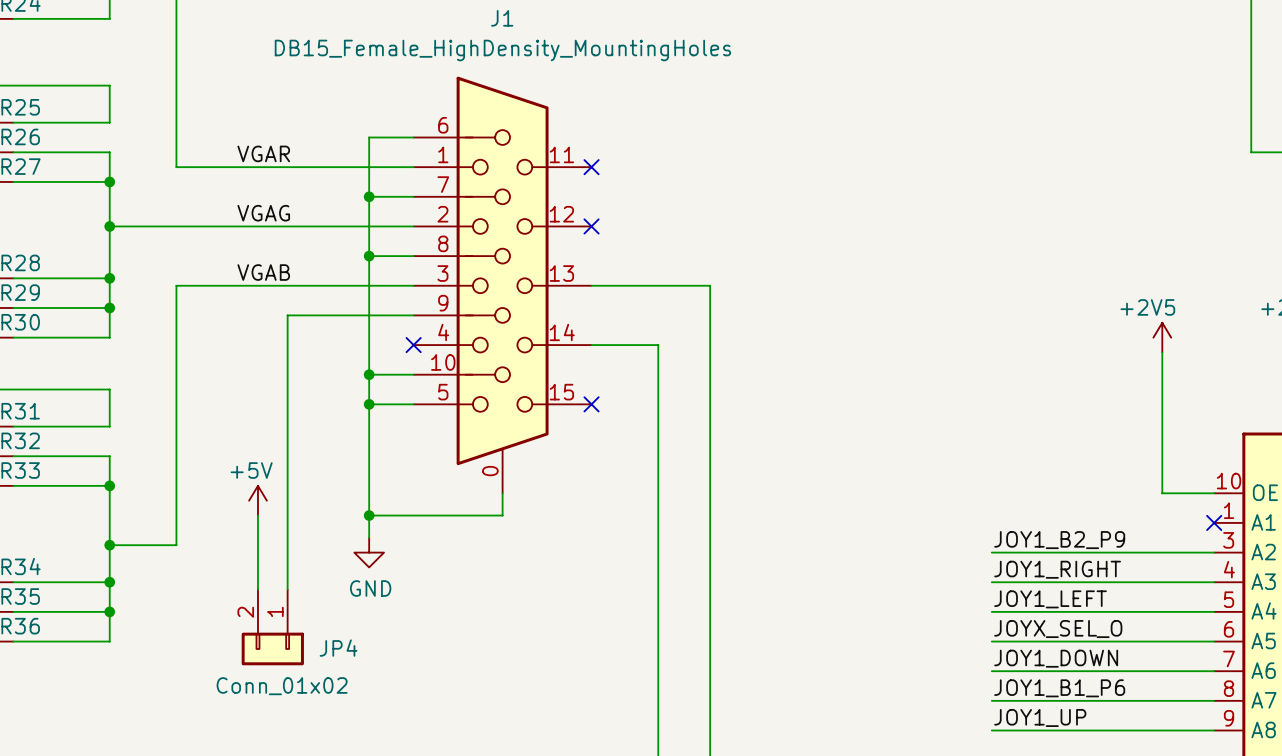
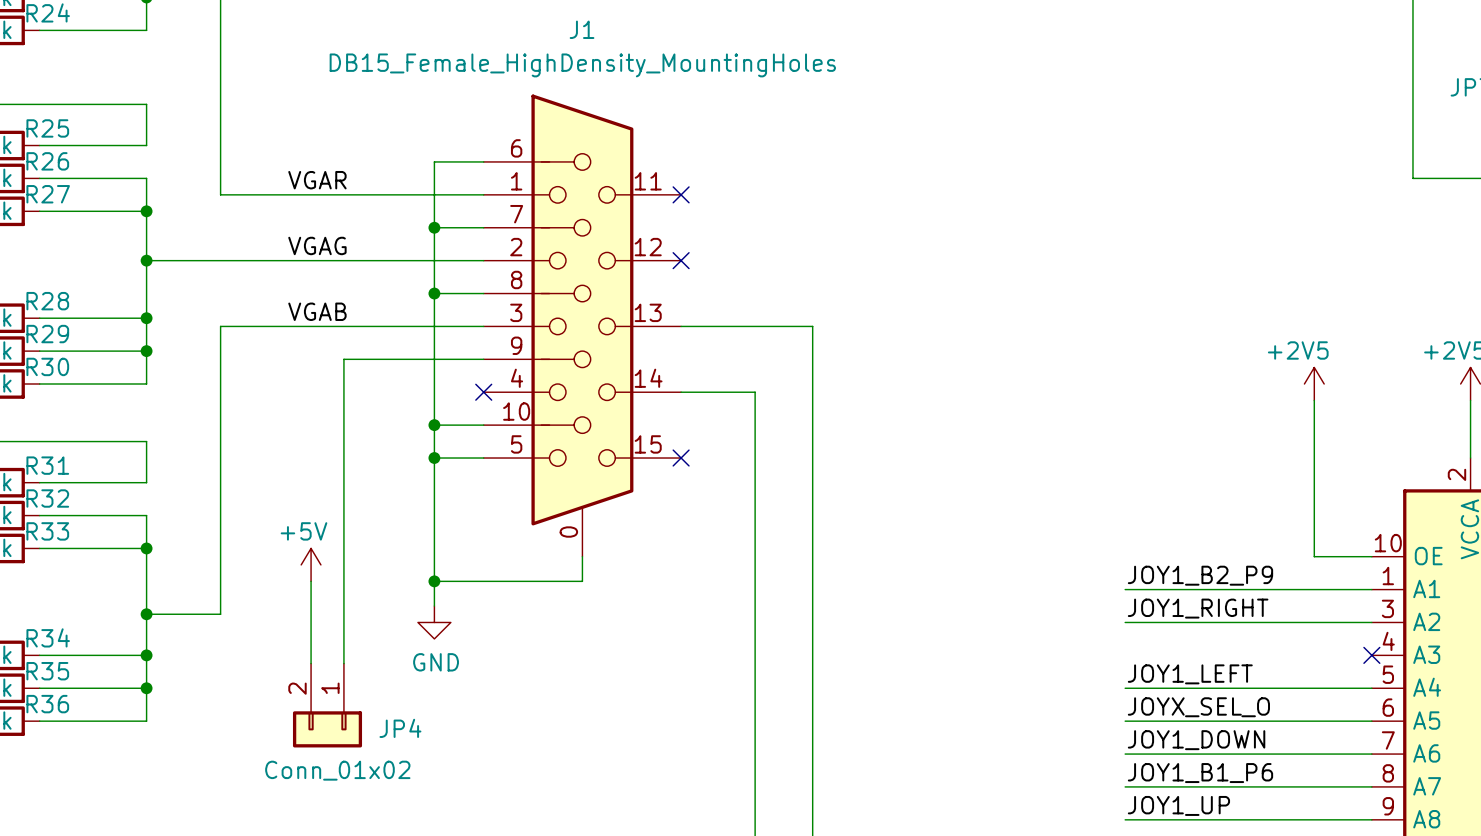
label: none -> JOY1_B2_P9 (1200, 575)
no-connect mark position: (1214, 522) -> (1371, 655)
label: JOY1_B2_P9 (1059, 540) -> JOY1_RIGHT (1198, 608)
label: JOY1_RIGHT (1057, 569) -> none
wire: (991, 582) (1214, 582) -> (1125, 589) (1371, 589)

